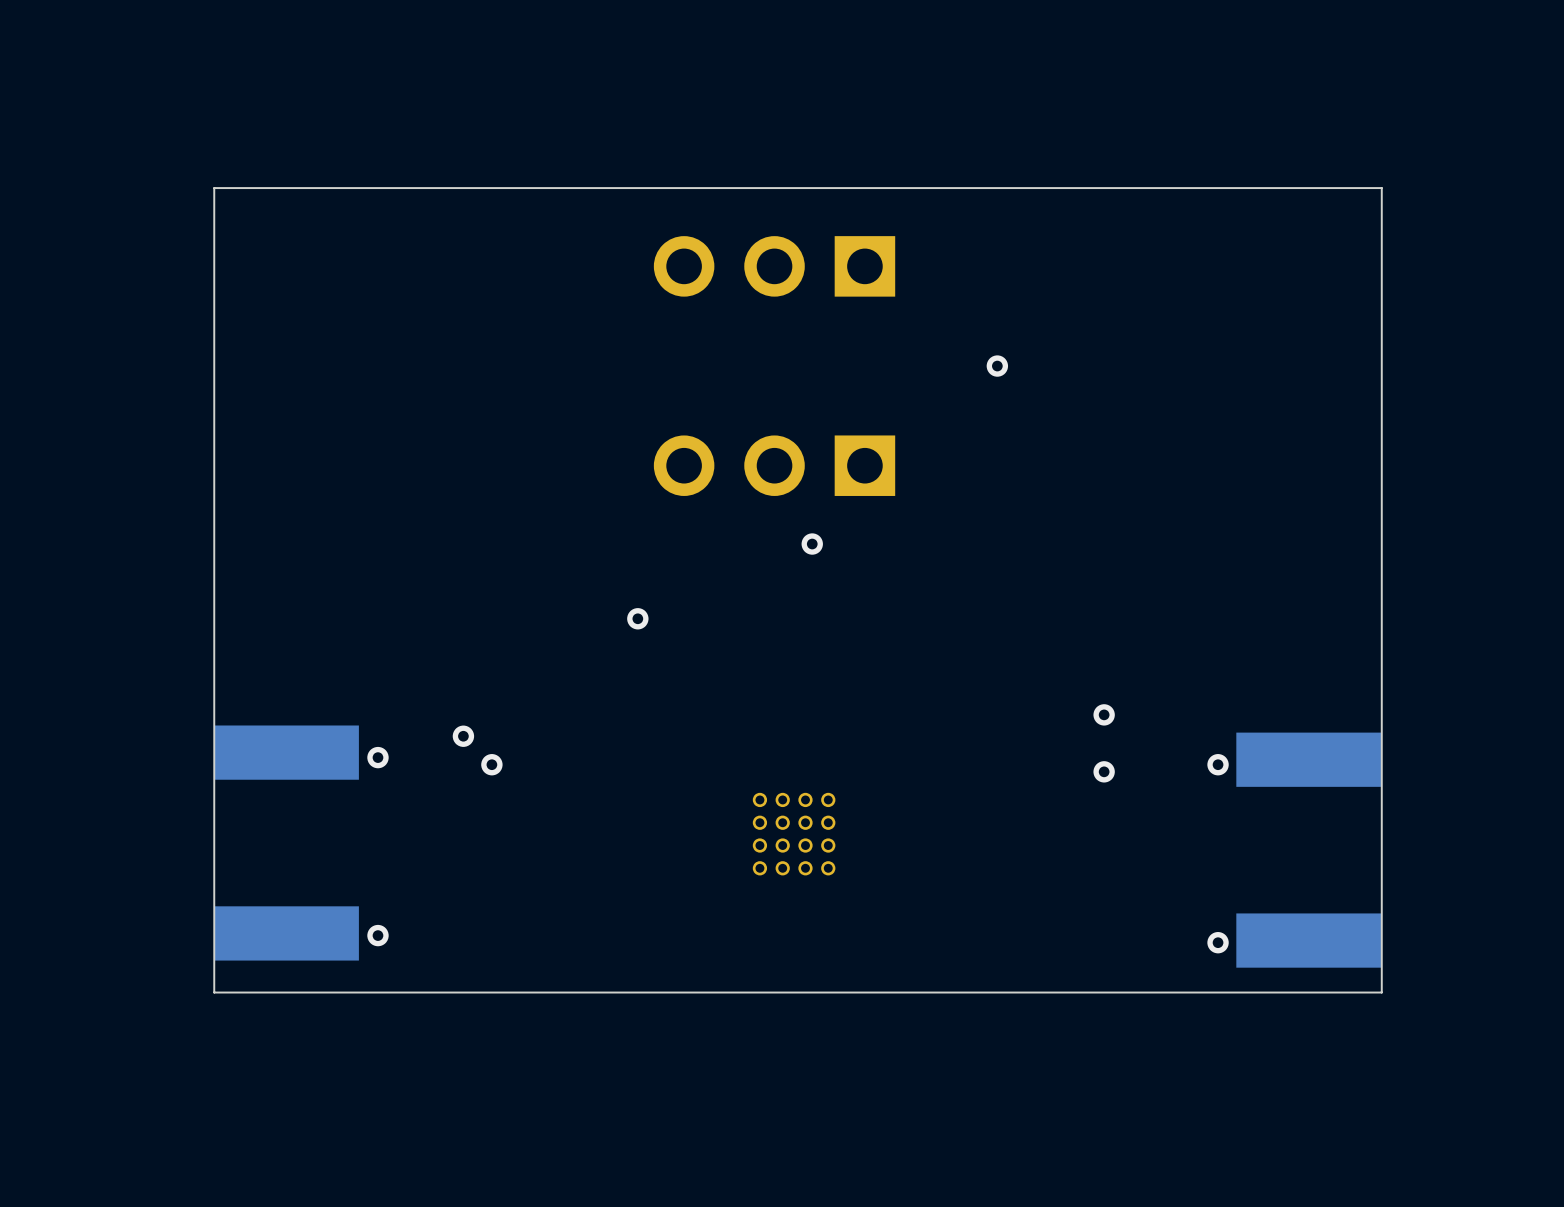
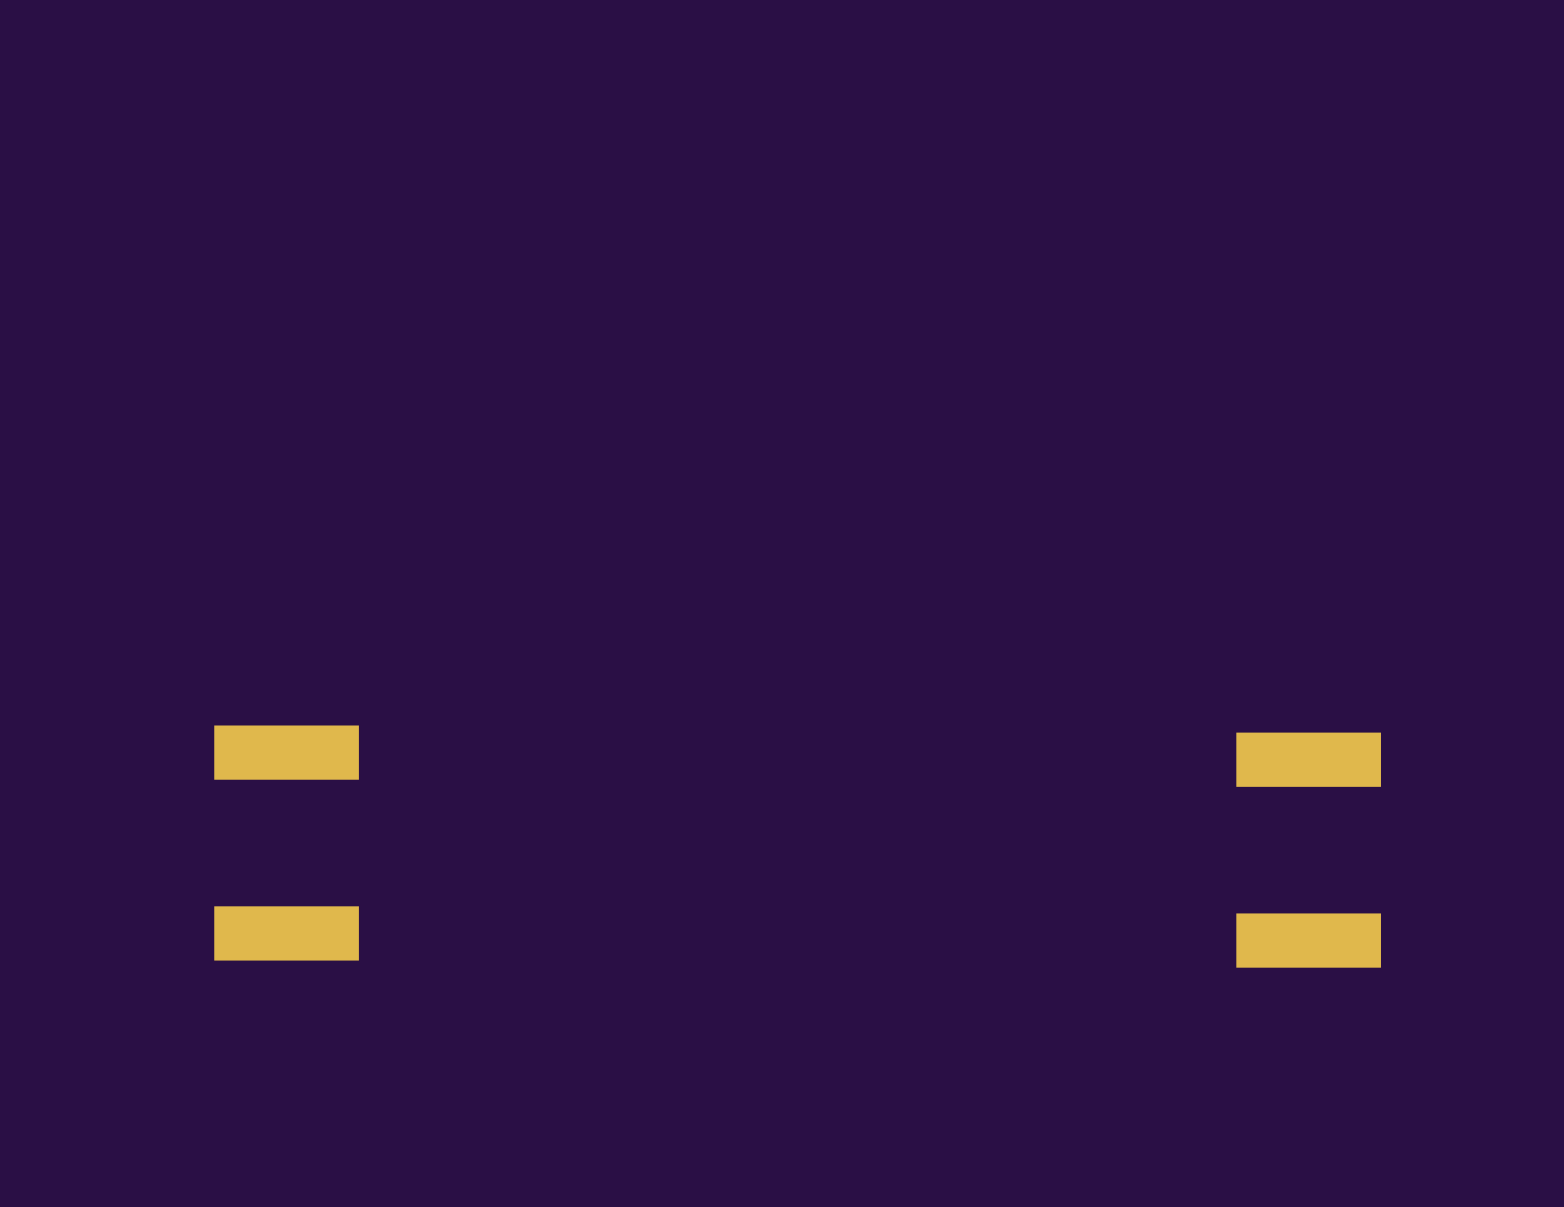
board edge: (1381, 188) (214, 188) (214, 992) (1381, 992) (1381, 188) -> none
part: (774, 266) -> none
via: (997, 366) -> none
part: (774, 465) -> none
via: (812, 544) -> none
via: (637, 618) -> none
via: (1104, 714) -> none
via: (463, 736) -> none
via: (377, 757) -> none
via: (491, 764) -> none
via: (1218, 764) -> none
via: (1104, 771) -> none
part: (794, 834) -> none
via: (377, 935) -> none
via: (1218, 942) -> none

